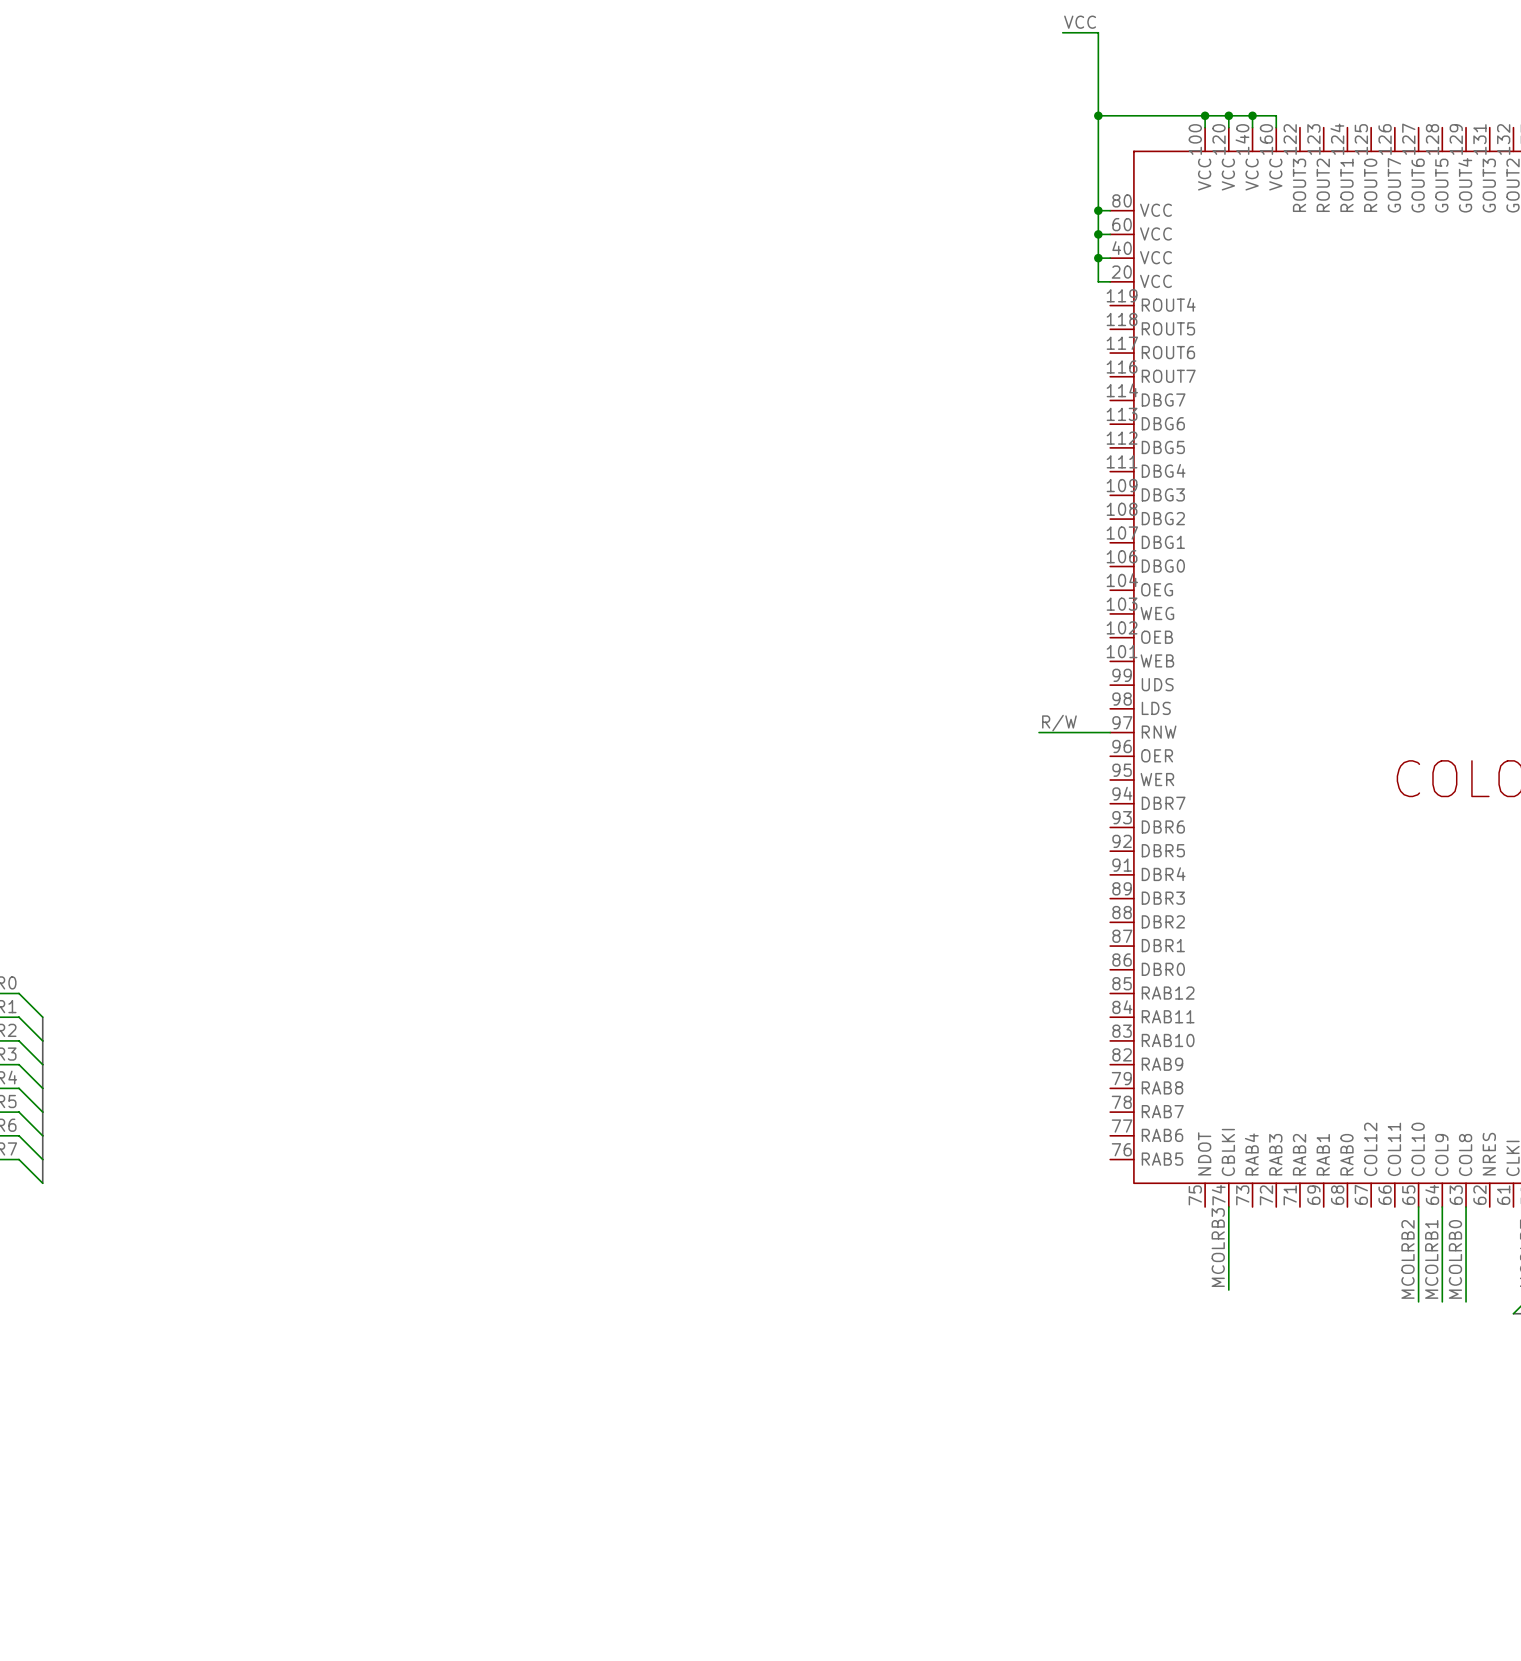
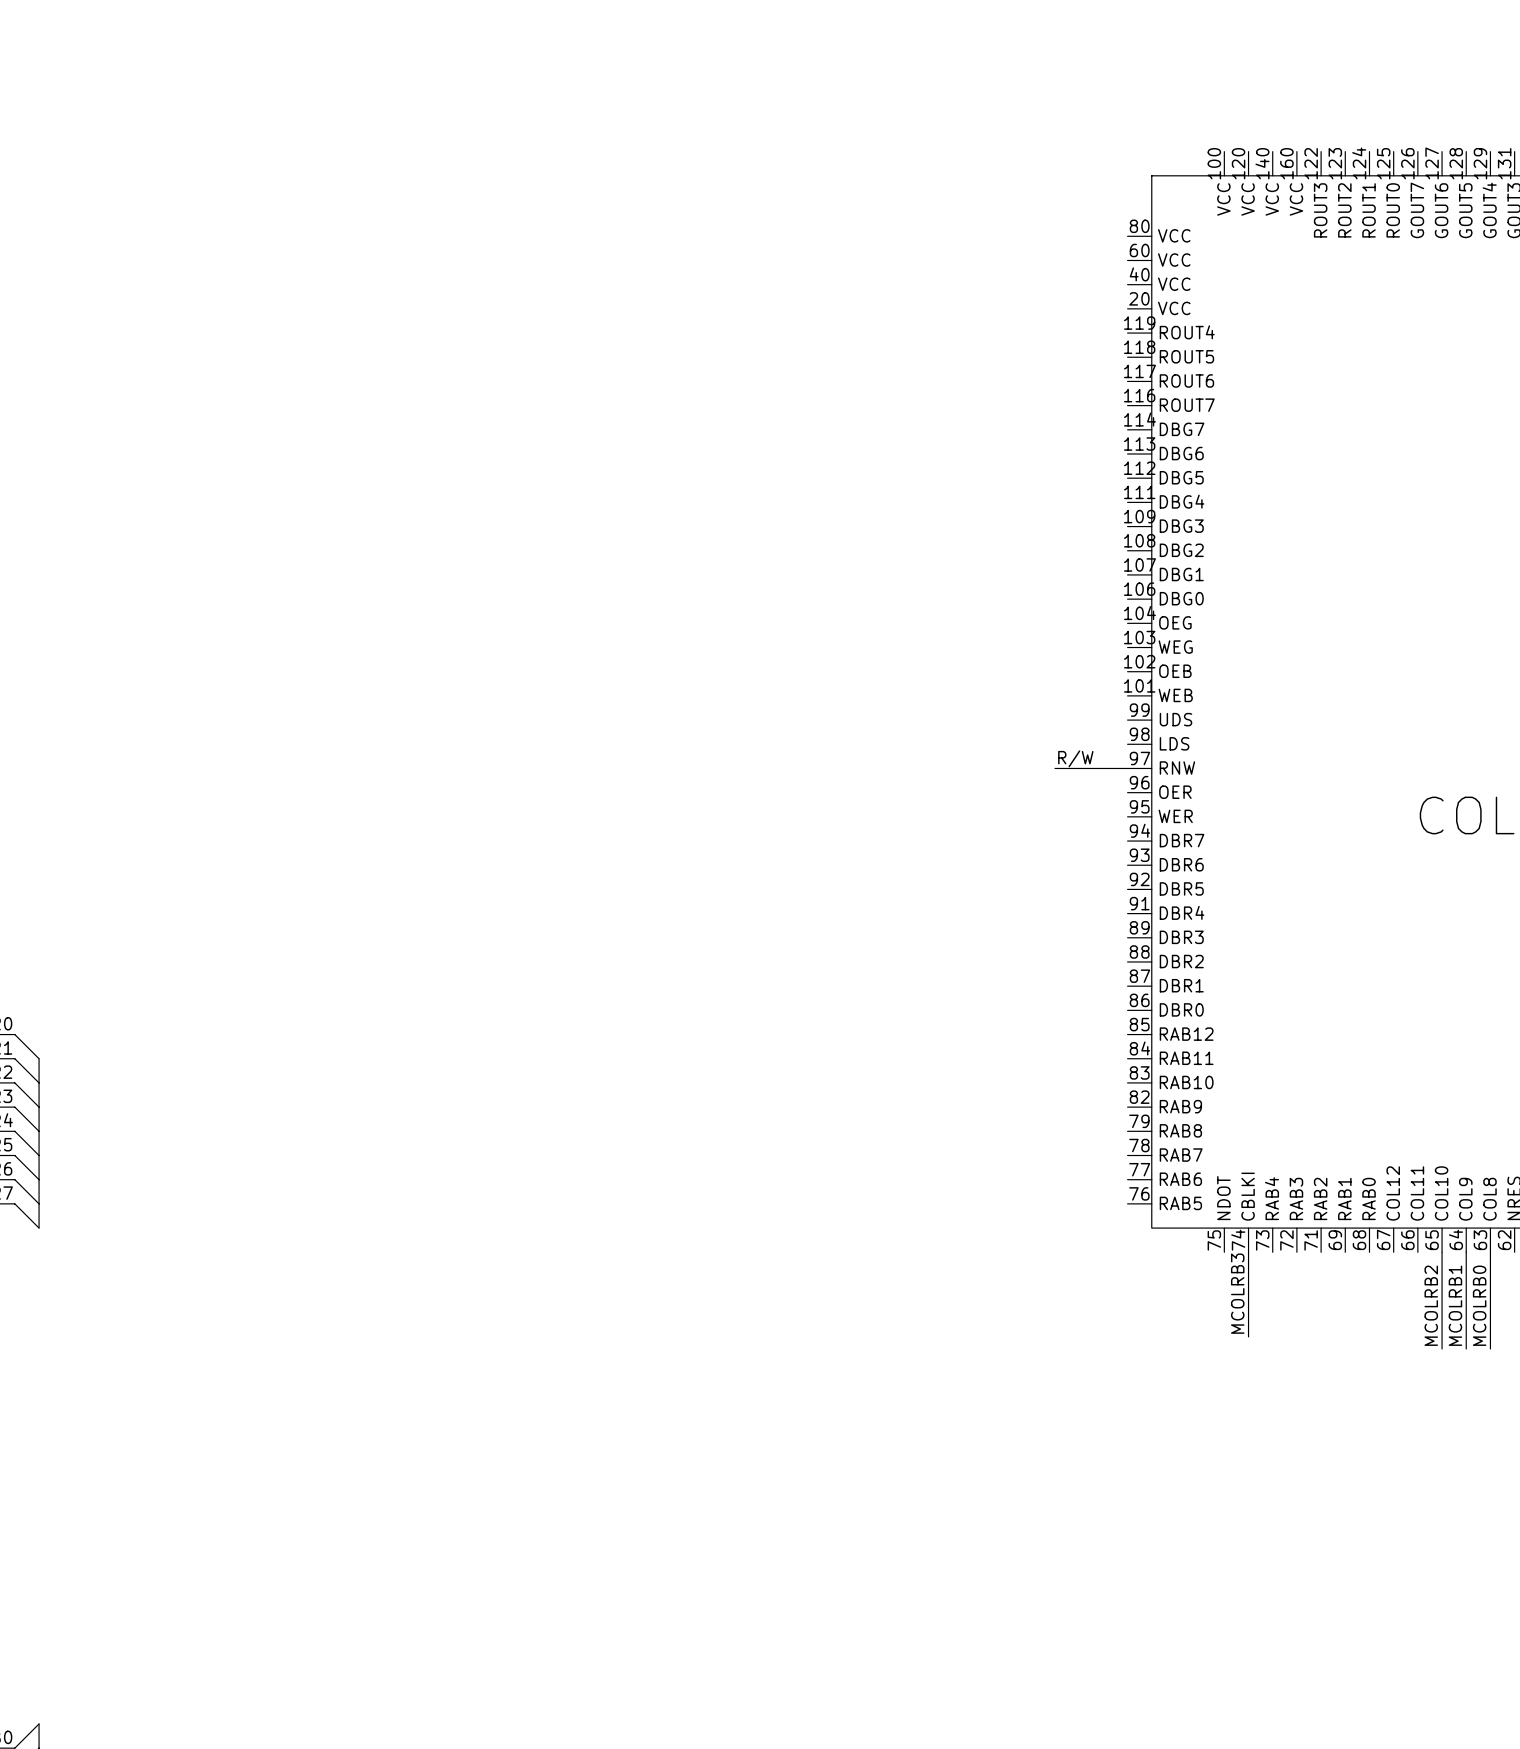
label: VCC (1080, 22) -> none
wire: (1062, 32) (1098, 32) (1098, 281) (1110, 281) -> none
wire: (1098, 115) (1276, 115) (1276, 127) -> none
junction: (1098, 115) -> none
wire: (1205, 115) (1205, 127) -> none
junction: (1205, 115) -> none
wire: (1228, 115) (1228, 127) -> none
junction: (1228, 115) -> none
wire: (1252, 115) (1252, 127) -> none
junction: (1252, 115) -> none
wire: (1098, 210) (1110, 210) -> none
junction: (1098, 210) -> none
wire: (1098, 234) (1110, 234) -> none
junction: (1098, 234) -> none
wire: (1098, 258) (1110, 258) -> none
junction: (1098, 258) -> none

